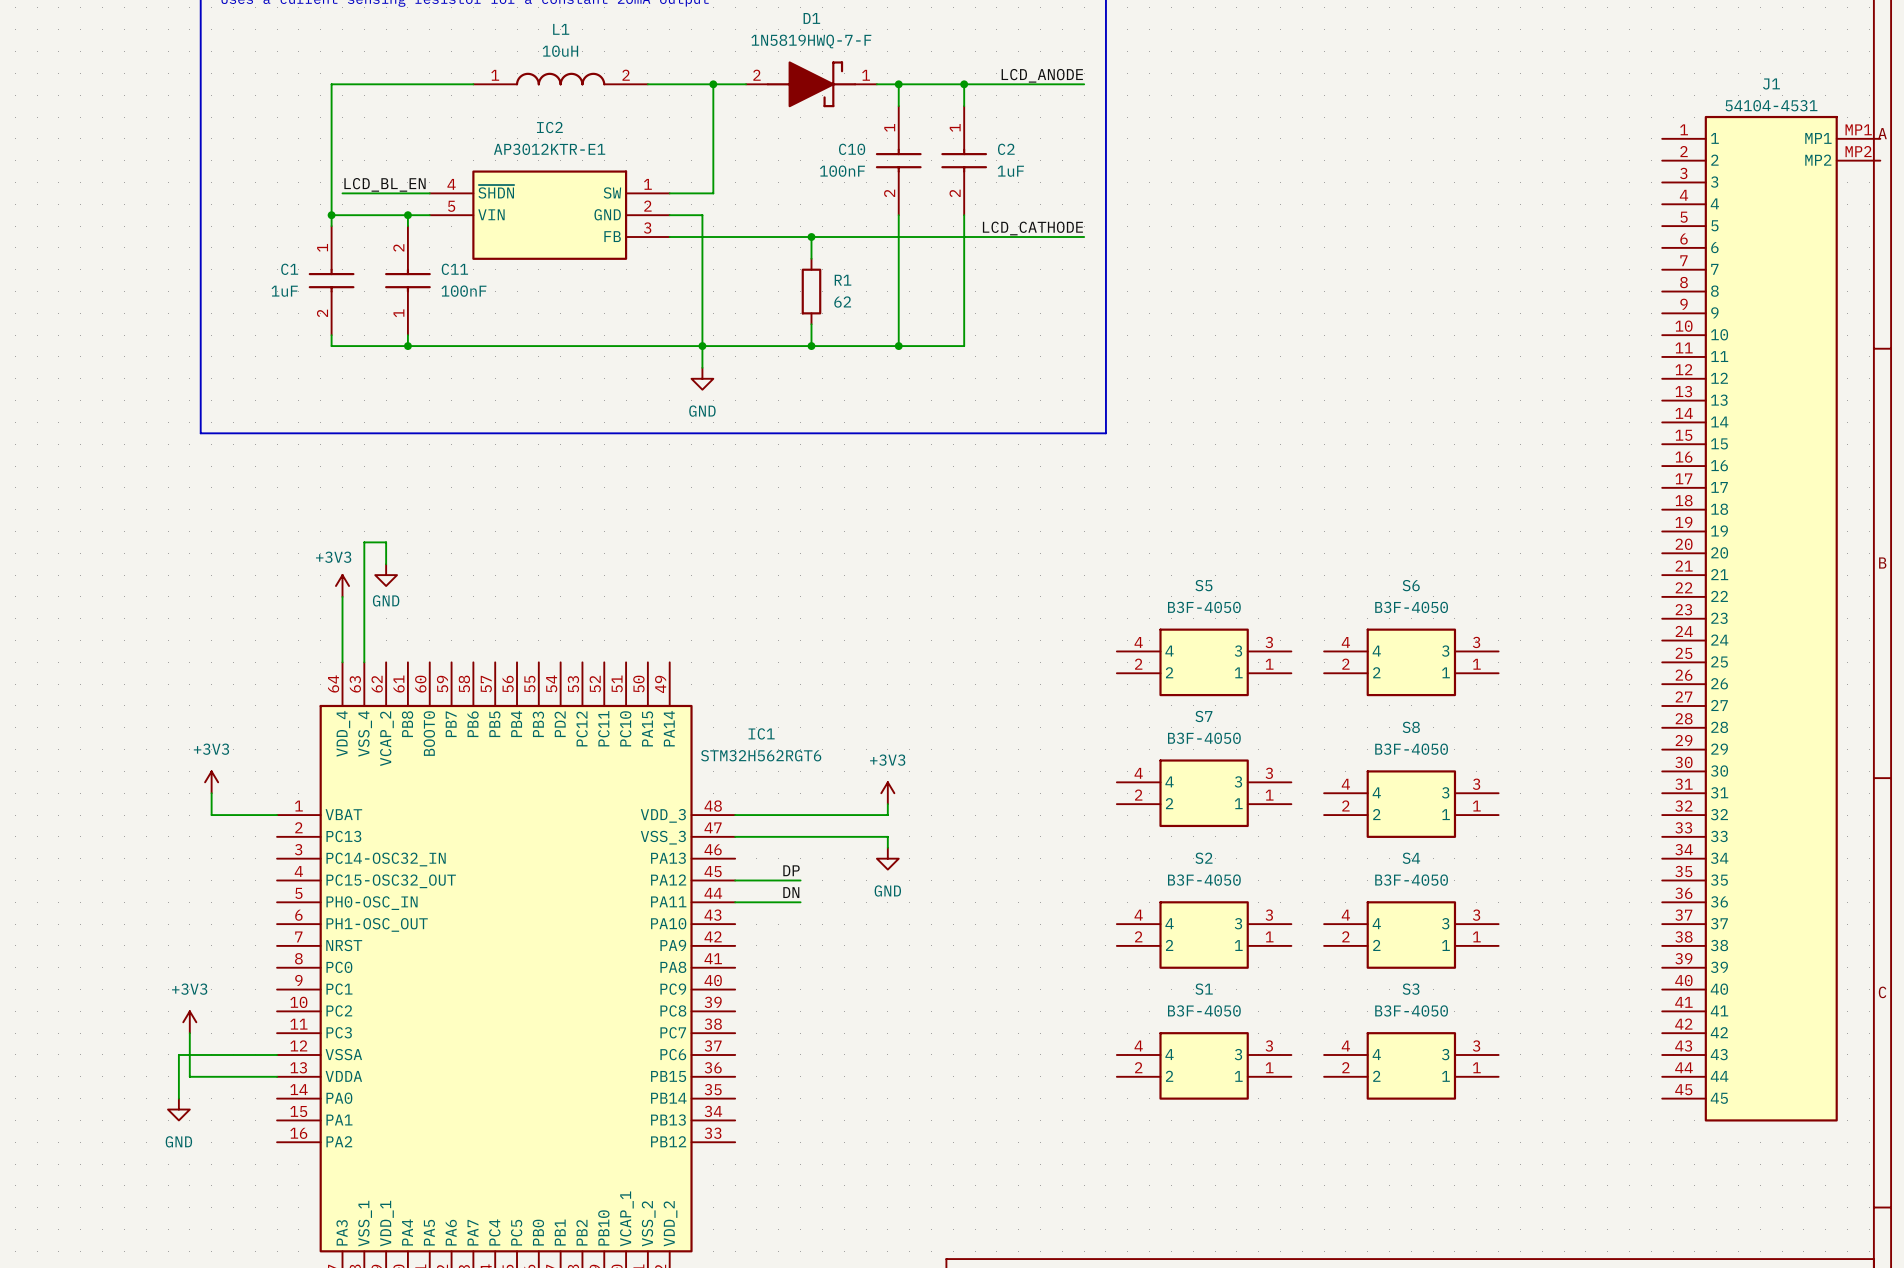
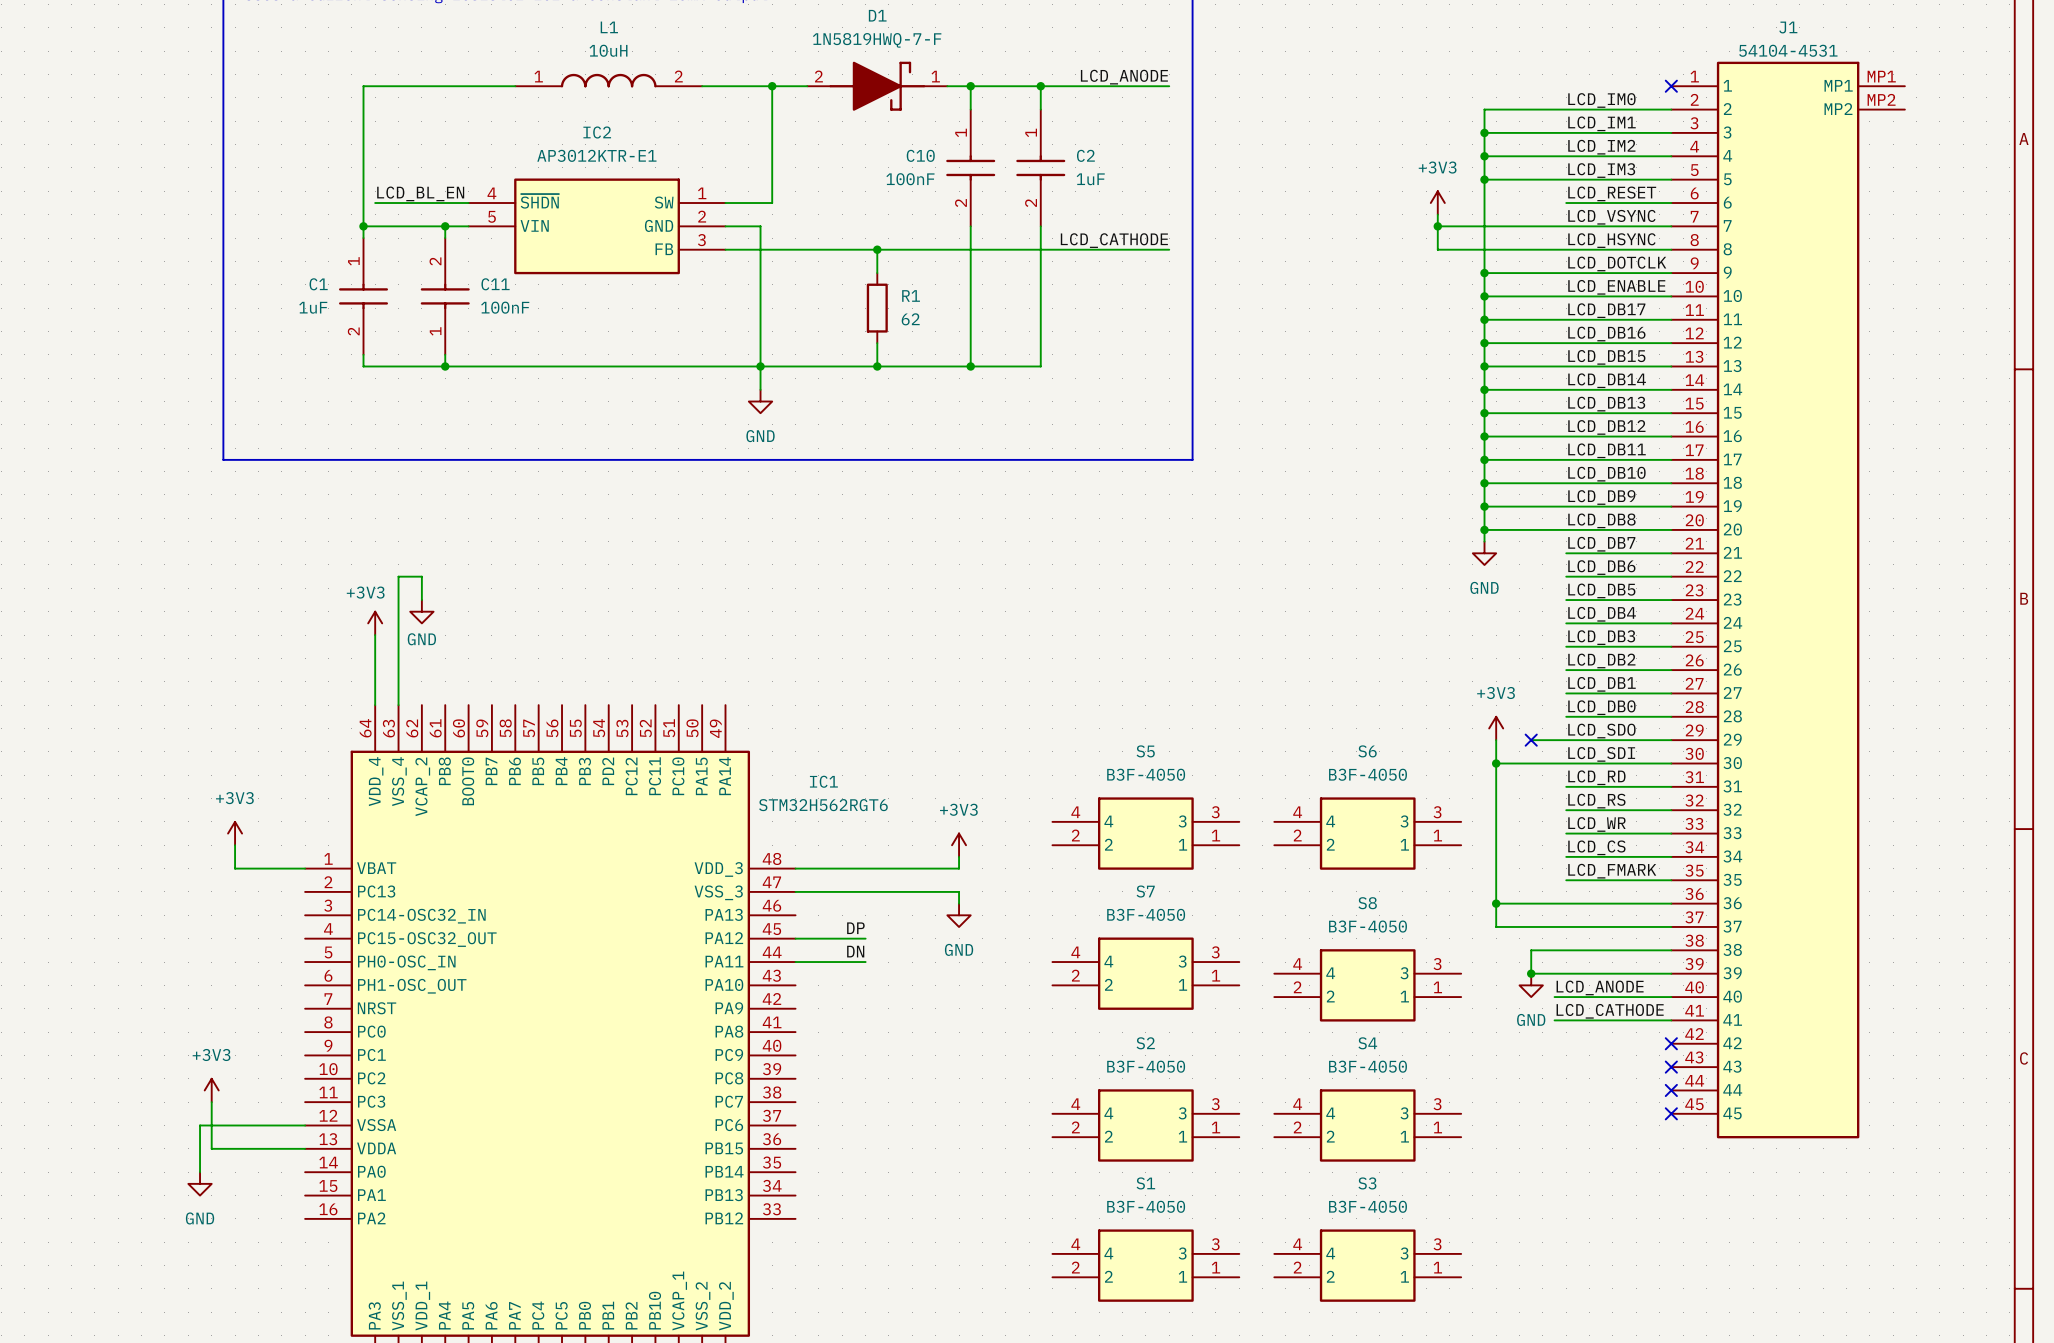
no-connect mark: none -> (1671, 86)
label: none -> LCD_IM0 (1601, 100)
wire: none -> (1671, 109) (1484, 109) (1484, 541)
label: none -> LCD_IM1 (1601, 123)
wire: none -> (1484, 132) (1671, 132)
junction: none -> (1484, 132)
label: none -> LCD_IM2 (1601, 147)
wire: none -> (1484, 156) (1671, 156)
junction: none -> (1484, 156)
label: none -> LCD_IM3 (1601, 170)
wire: none -> (1484, 179) (1671, 179)
junction: none -> (1484, 179)
label: none -> LCD_RESET (1612, 193)
power symbol: none -> +3V3 (1437, 203)
wire: none -> (1566, 203) (1671, 203)
wire: none -> (1437, 214) (1437, 249) (1671, 249)
label: none -> LCD_VSYNC (1611, 217)
wire: none -> (1437, 226) (1671, 226)
junction: none -> (1437, 226)
label: none -> LCD_HSYNC (1611, 240)
label: none -> LCD_DOTCLK (1617, 263)
wire: none -> (1484, 273) (1671, 273)
junction: none -> (1484, 273)
label: none -> LCD_ENABLE (1616, 287)
wire: none -> (1484, 296) (1671, 296)
junction: none -> (1484, 296)
label: none -> LCD_DB17 (1606, 310)
wire: none -> (1484, 319) (1671, 319)
junction: none -> (1484, 319)
label: none -> LCD_DB16 (1606, 334)
wire: none -> (1484, 343) (1671, 343)
junction: none -> (1484, 343)
label: none -> LCD_DB15 (1606, 357)
wire: none -> (1484, 366) (1671, 366)
junction: none -> (1484, 366)
label: none -> LCD_DB14 (1607, 380)
wire: none -> (1484, 389) (1671, 389)
junction: none -> (1484, 389)
label: none -> LCD_DB13 (1606, 404)
wire: none -> (1484, 413) (1671, 413)
junction: none -> (1484, 413)
label: none -> LCD_DB12 (1606, 427)
wire: none -> (1484, 436) (1671, 436)
junction: none -> (1484, 436)
label: none -> LCD_DB11 (1607, 450)
wire: none -> (1484, 459) (1671, 459)
junction: none -> (1484, 459)
label: none -> LCD_DB10 (1606, 474)
wire: none -> (1484, 483) (1671, 483)
junction: none -> (1484, 483)
label: none -> LCD_DB9 (1601, 497)
wire: none -> (1484, 506) (1671, 506)
junction: none -> (1484, 506)
label: none -> LCD_DB8 (1601, 520)
wire: none -> (1484, 529) (1671, 529)
junction: none -> (1484, 529)
label: none -> LCD_DB7 (1601, 544)
power symbol: none -> GND (1484, 553)
wire: none -> (1566, 553) (1671, 553)
label: none -> LCD_DB6 (1601, 567)
wire: none -> (1566, 576) (1671, 576)
label: none -> LCD_DB5 (1601, 590)
wire: none -> (1566, 600) (1671, 600)
label: none -> LCD_DB4 (1602, 614)
wire: none -> (1566, 623) (1671, 623)
label: none -> LCD_DB3 (1601, 637)
wire: none -> (1566, 646) (1671, 646)
J1 position: (1771, 618) -> (1788, 600)
label: none -> LCD_DB2 (1601, 660)
wire: none -> (1566, 670) (1671, 670)
label: none -> LCD_DB1 (1601, 684)
wire: none -> (1566, 693) (1671, 693)
S5 position: (1204, 662) -> (1145, 833)
S6 position: (1411, 662) -> (1367, 833)
label: none -> LCD_DB0 (1601, 707)
wire: none -> (1566, 716) (1671, 716)
power symbol: none -> +3V3 (1496, 728)
label: none -> LCD_SDO (1601, 731)
wire: none -> (1496, 740) (1496, 926) (1671, 926)
wire: none -> (1531, 740) (1671, 740)
no-connect mark: none -> (1531, 740)
label: none -> LCD_SDI (1601, 754)
wire: none -> (1496, 763) (1671, 763)
junction: none -> (1496, 763)
label: none -> LCD_RD (1596, 777)
wire: none -> (1566, 786) (1671, 786)
label: none -> LCD_RS (1596, 801)
wire: none -> (1566, 810) (1671, 810)
label: none -> LCD_WR (1596, 824)
wire: none -> (1566, 833) (1671, 833)
S7 position: (1204, 793) -> (1145, 973)
label: none -> LCD_CS (1596, 847)
S8 position: (1411, 804) -> (1367, 985)
wire: none -> (1566, 856) (1671, 856)
label: none -> LCD_FMARK (1612, 871)
wire: none -> (1566, 880) (1671, 880)
wire: none -> (1496, 903) (1671, 903)
junction: none -> (1496, 903)
wire: none -> (1671, 950) (1531, 950) (1531, 973) (1671, 973)
junction: none -> (1531, 973)
power symbol: none -> GND (1531, 985)
label: none -> LCD_ANODE (1600, 987)
S2 position: (1204, 935) -> (1145, 1125)
S4 position: (1411, 935) -> (1367, 1125)
wire: none -> (1554, 997) (1671, 997)
label: none -> LCD_CATHODE (1610, 1011)
wire: none -> (1554, 1020) (1671, 1020)
no-connect mark: none -> (1671, 1043)
no-connect mark: none -> (1671, 1067)
no-connect mark: none -> (1671, 1090)
no-connect mark: none -> (1671, 1113)
S1 position: (1204, 1065) -> (1145, 1265)
S3 position: (1411, 1065) -> (1367, 1265)

